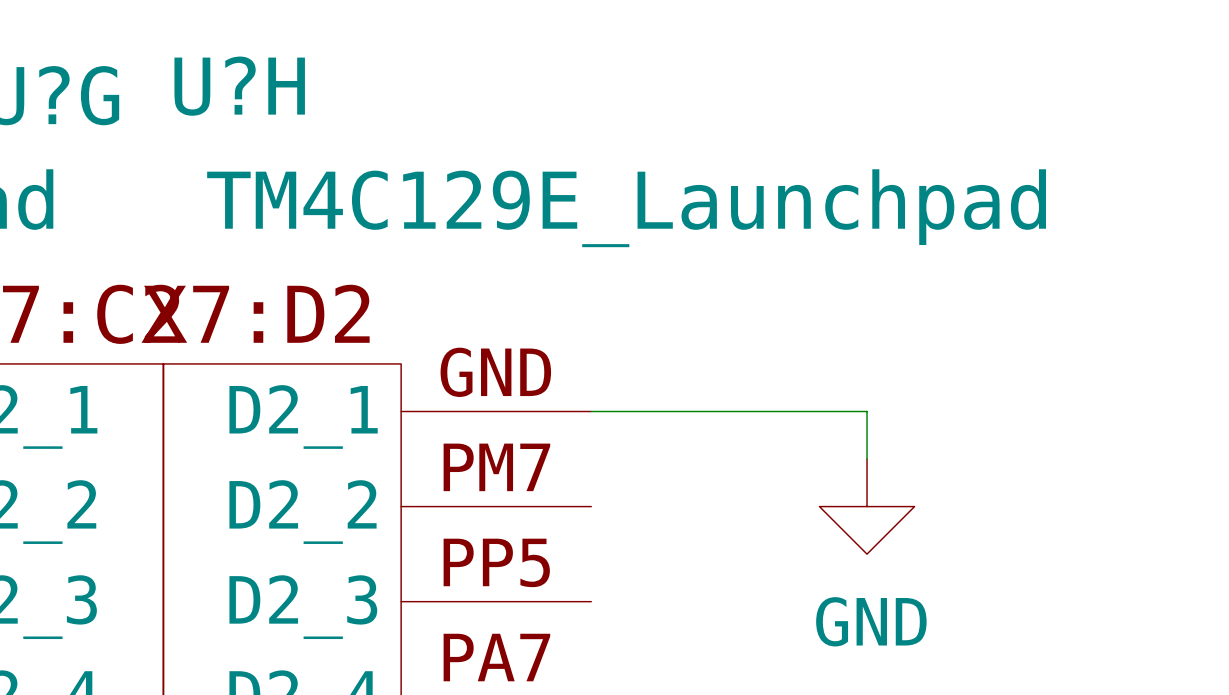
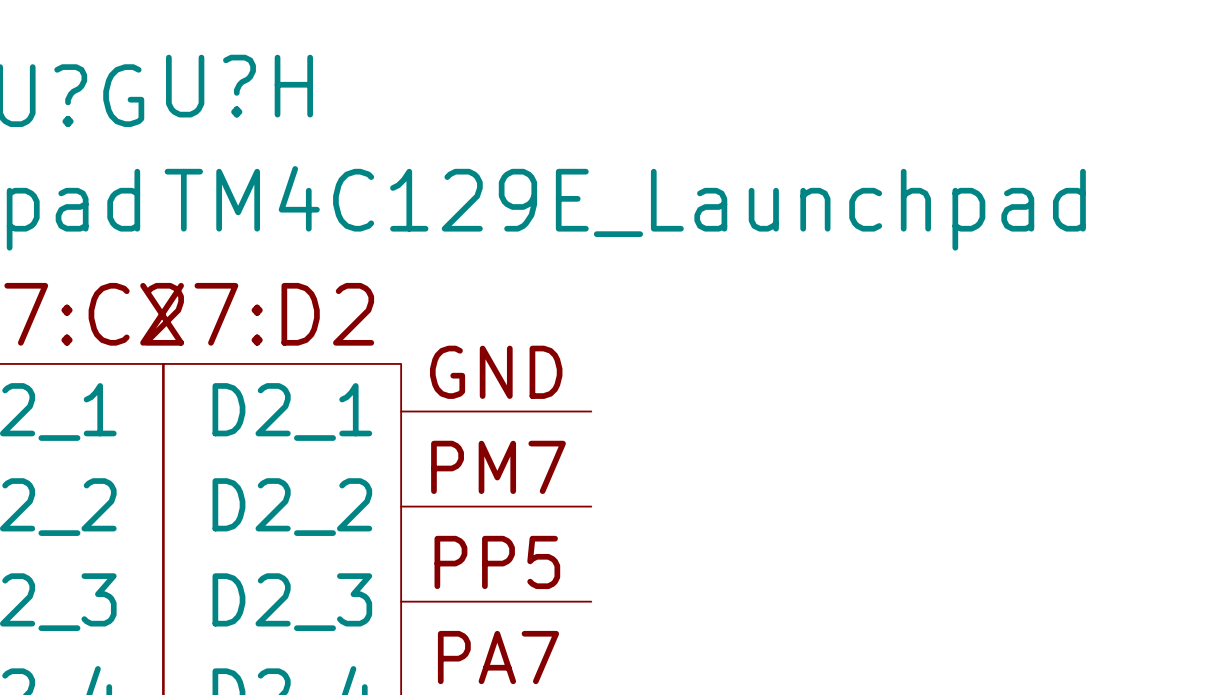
wire: (591, 411) (867, 411) (867, 459) -> none
power symbol: GND (867, 506) -> none

